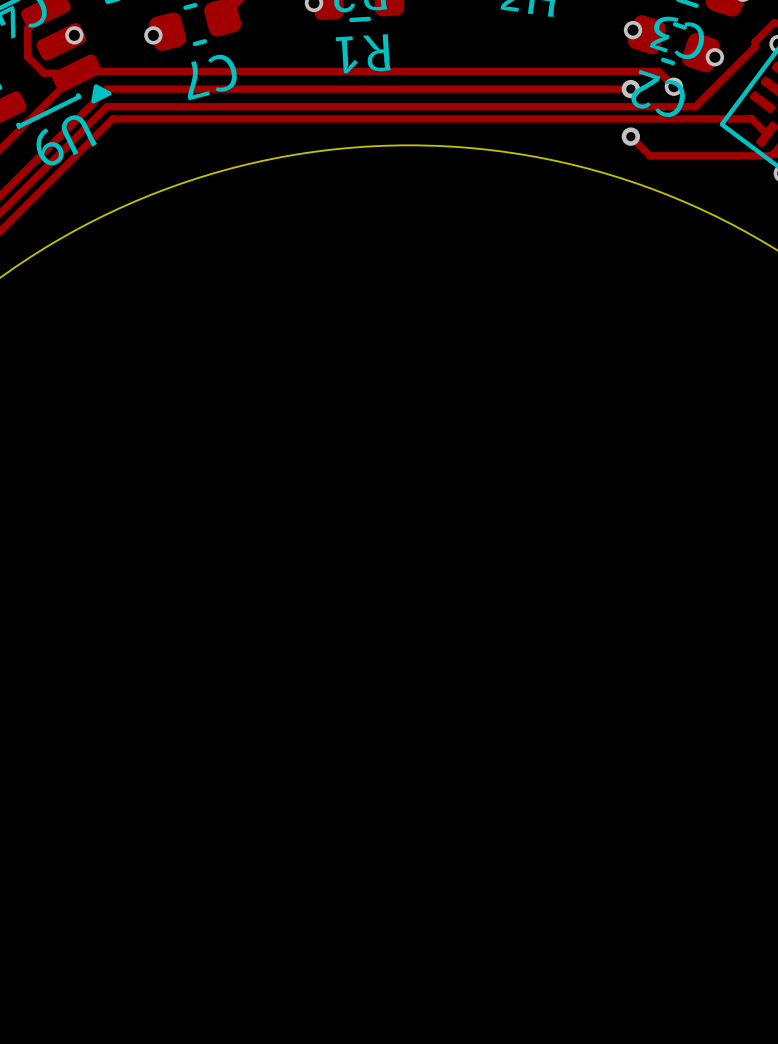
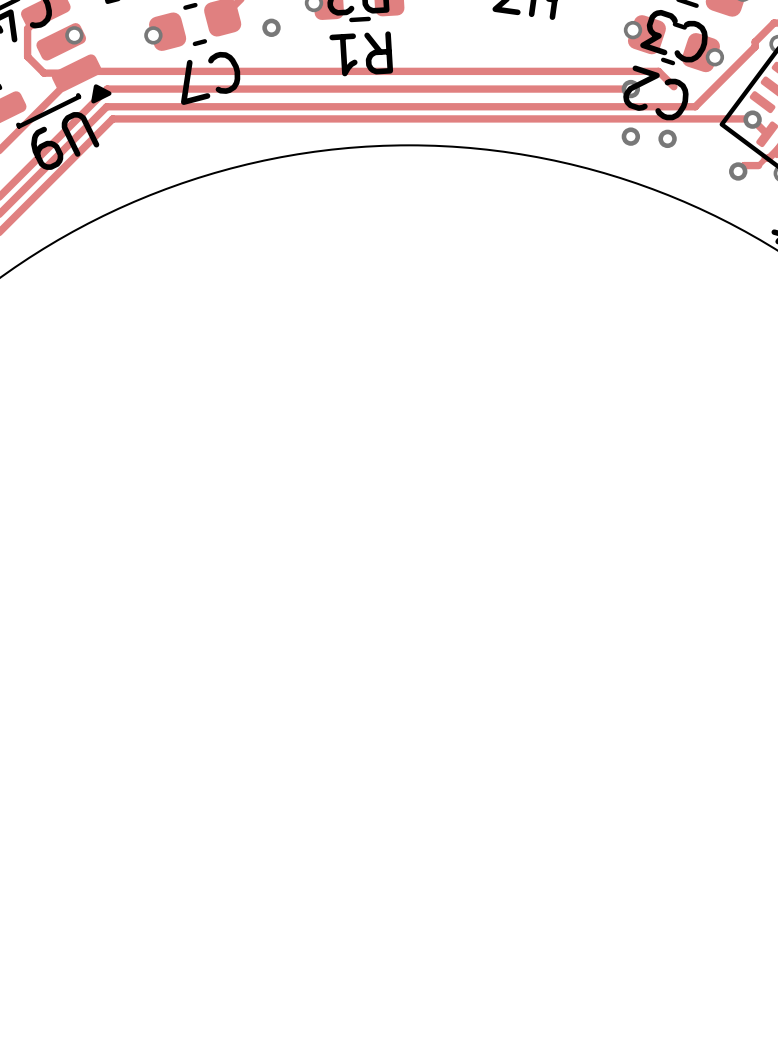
via: none -> (271, 27)
via: (673, 86) -> none
via: none -> (752, 119)
track: (630, 136) (650, 155) (771, 155) -> (738, 171) (744, 165) (758, 165) (765, 158) (771, 155)
via: none -> (667, 138)
via: none -> (738, 171)

